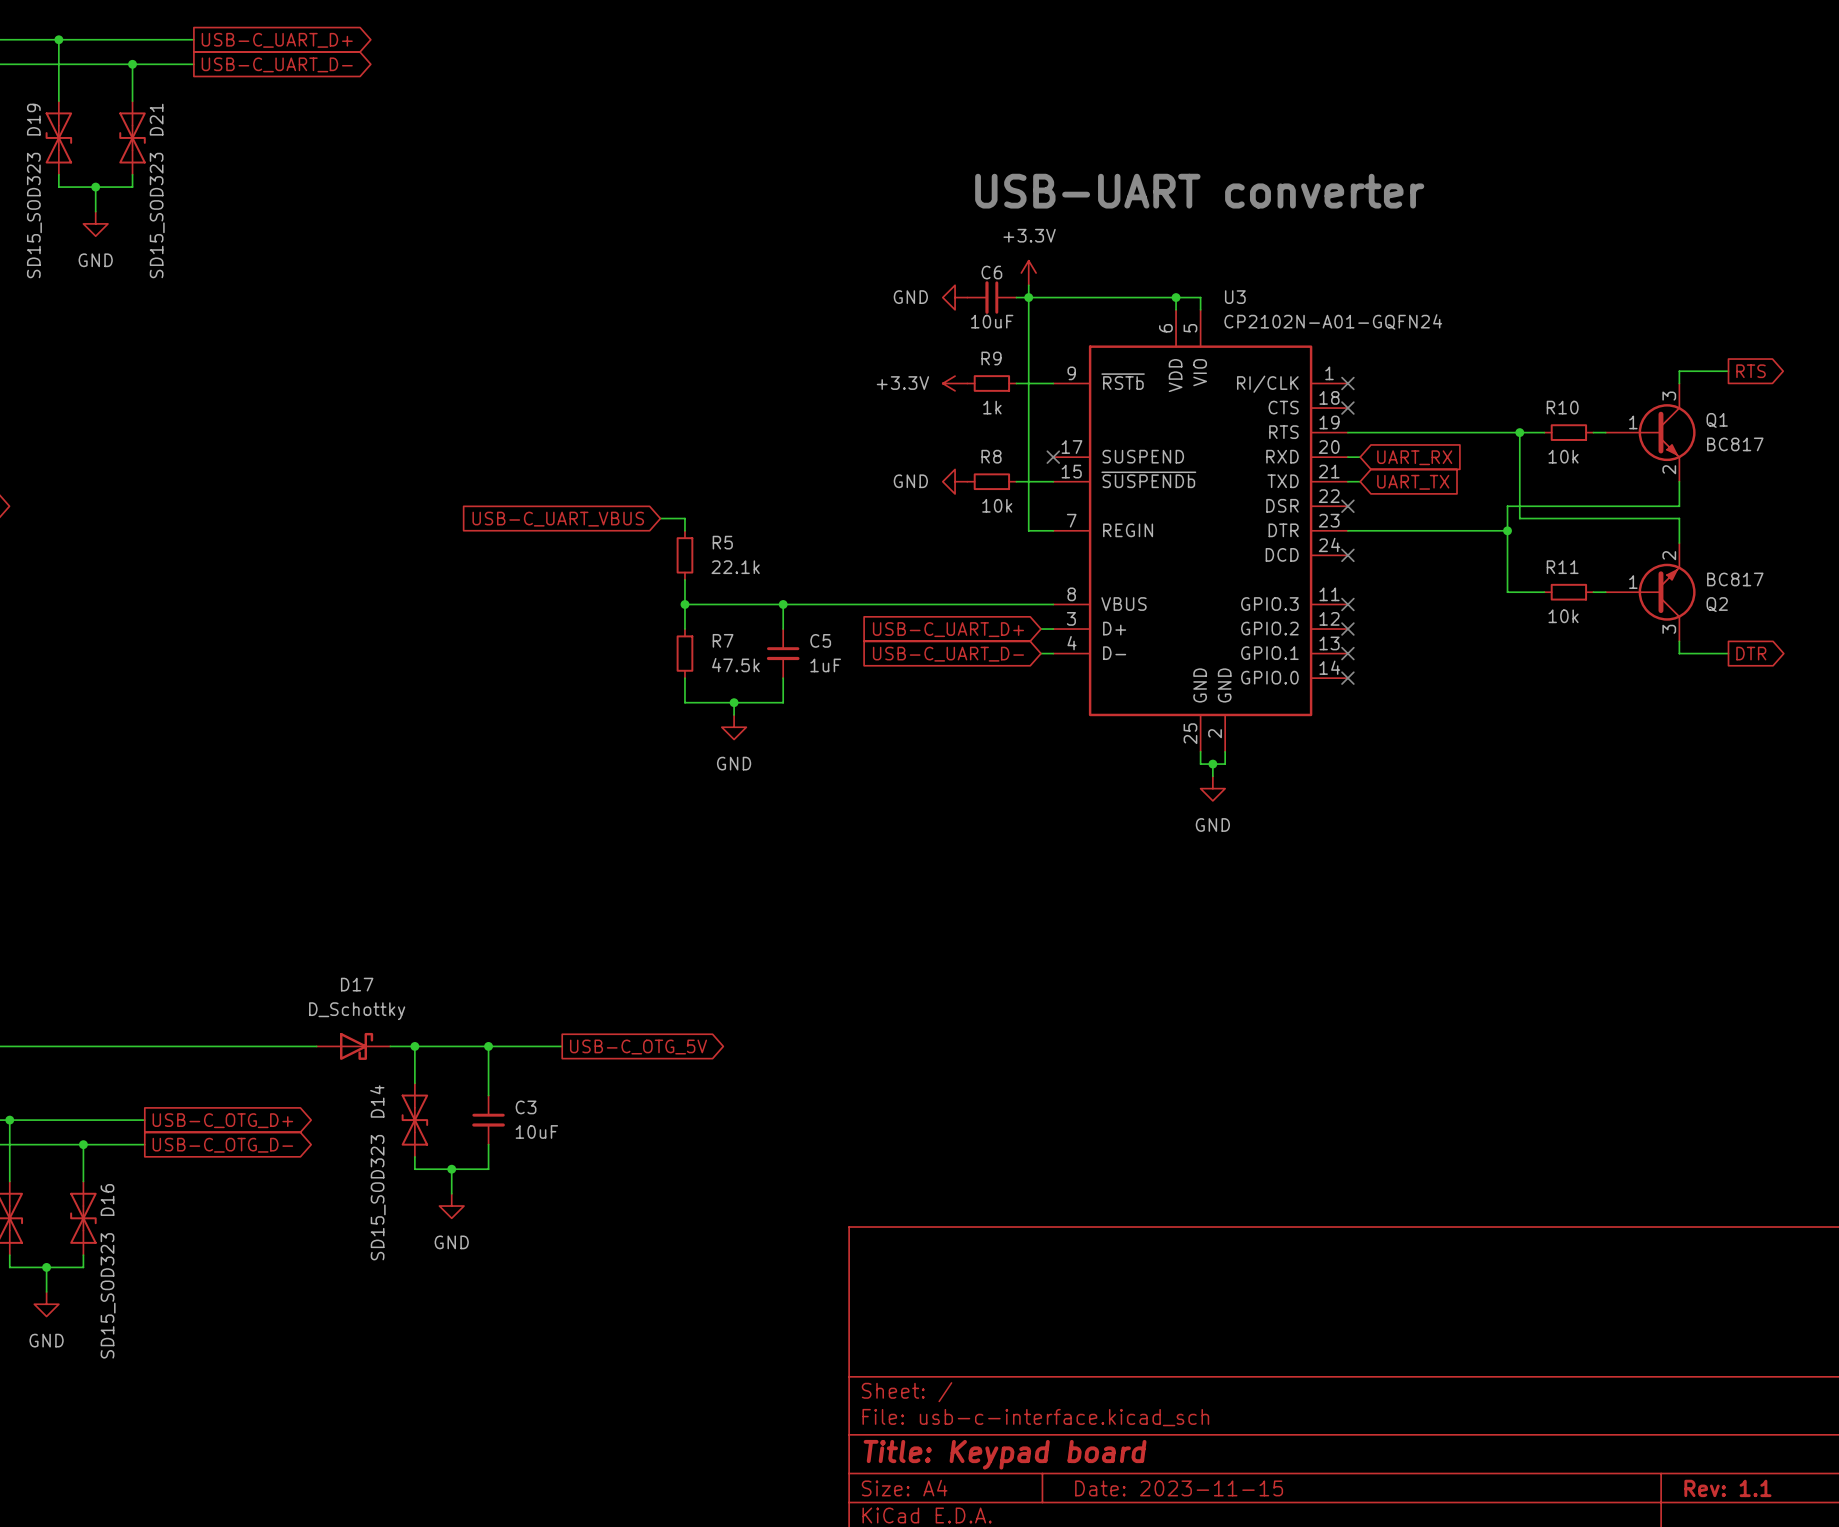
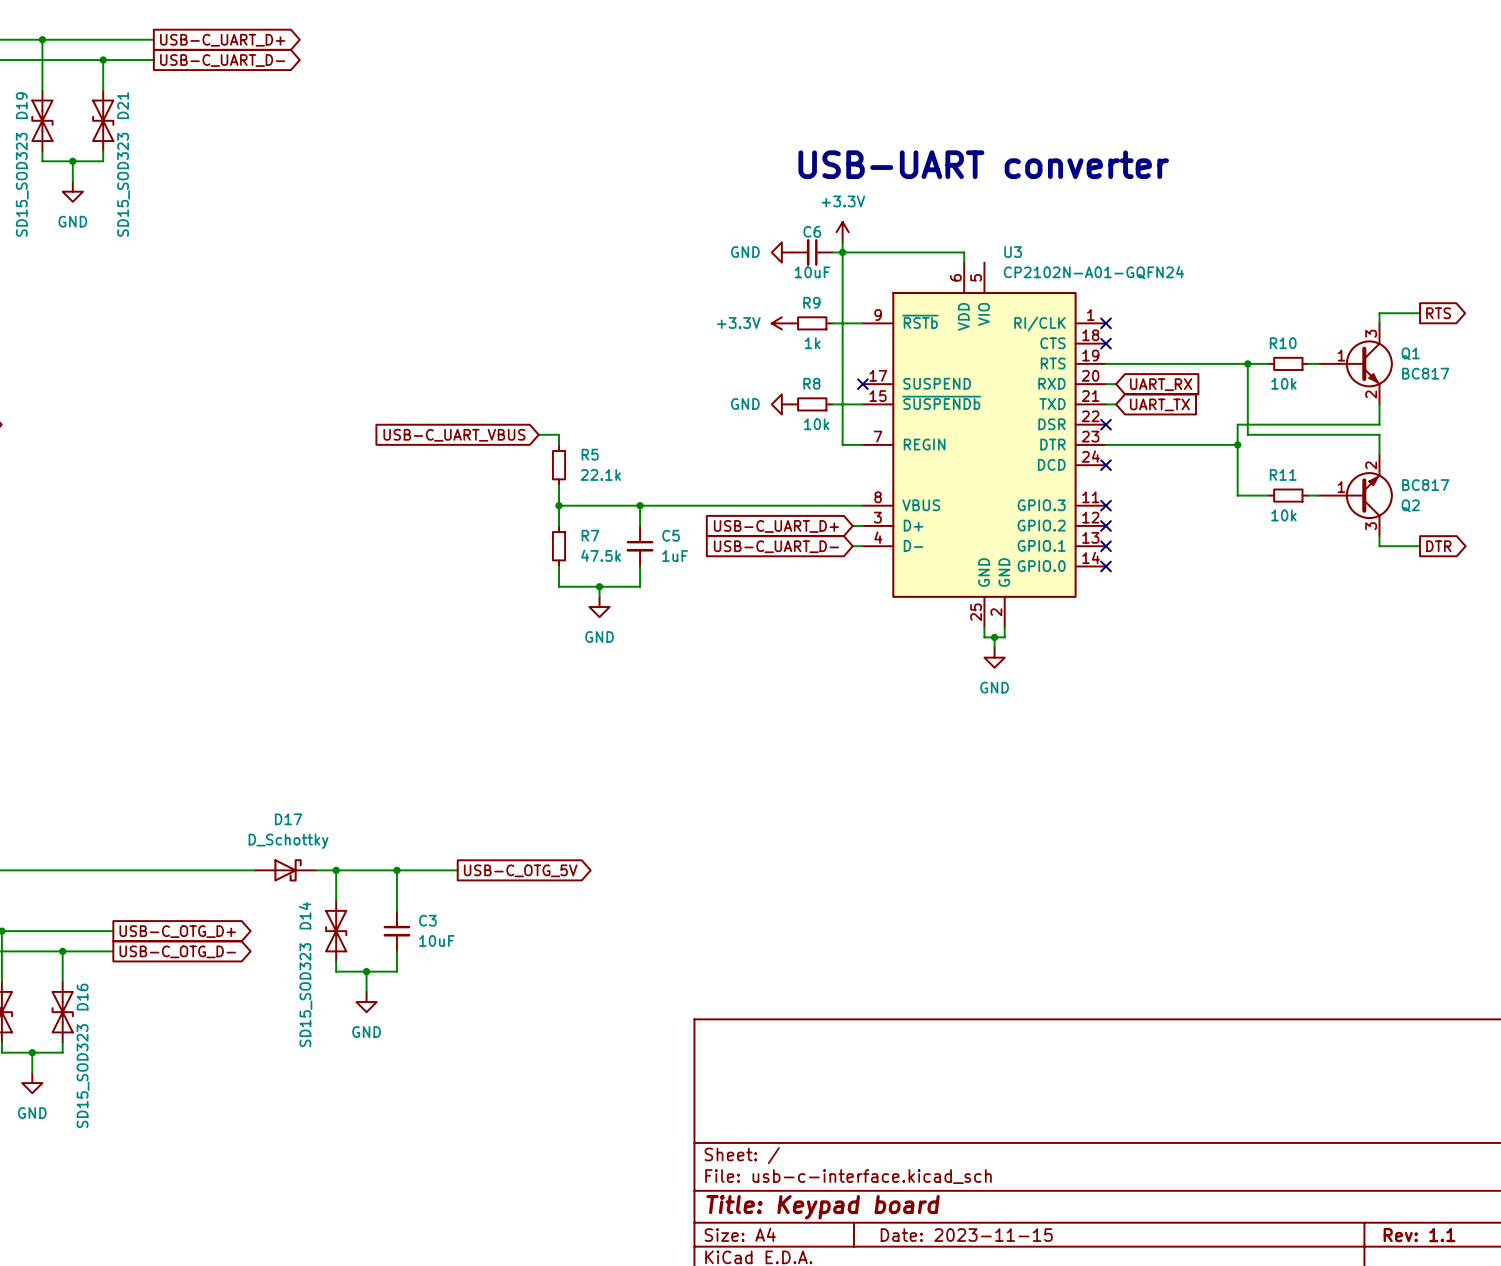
wire: (1176, 297) (1200, 297) (1200, 309) -> none
junction: (1176, 297) -> none

